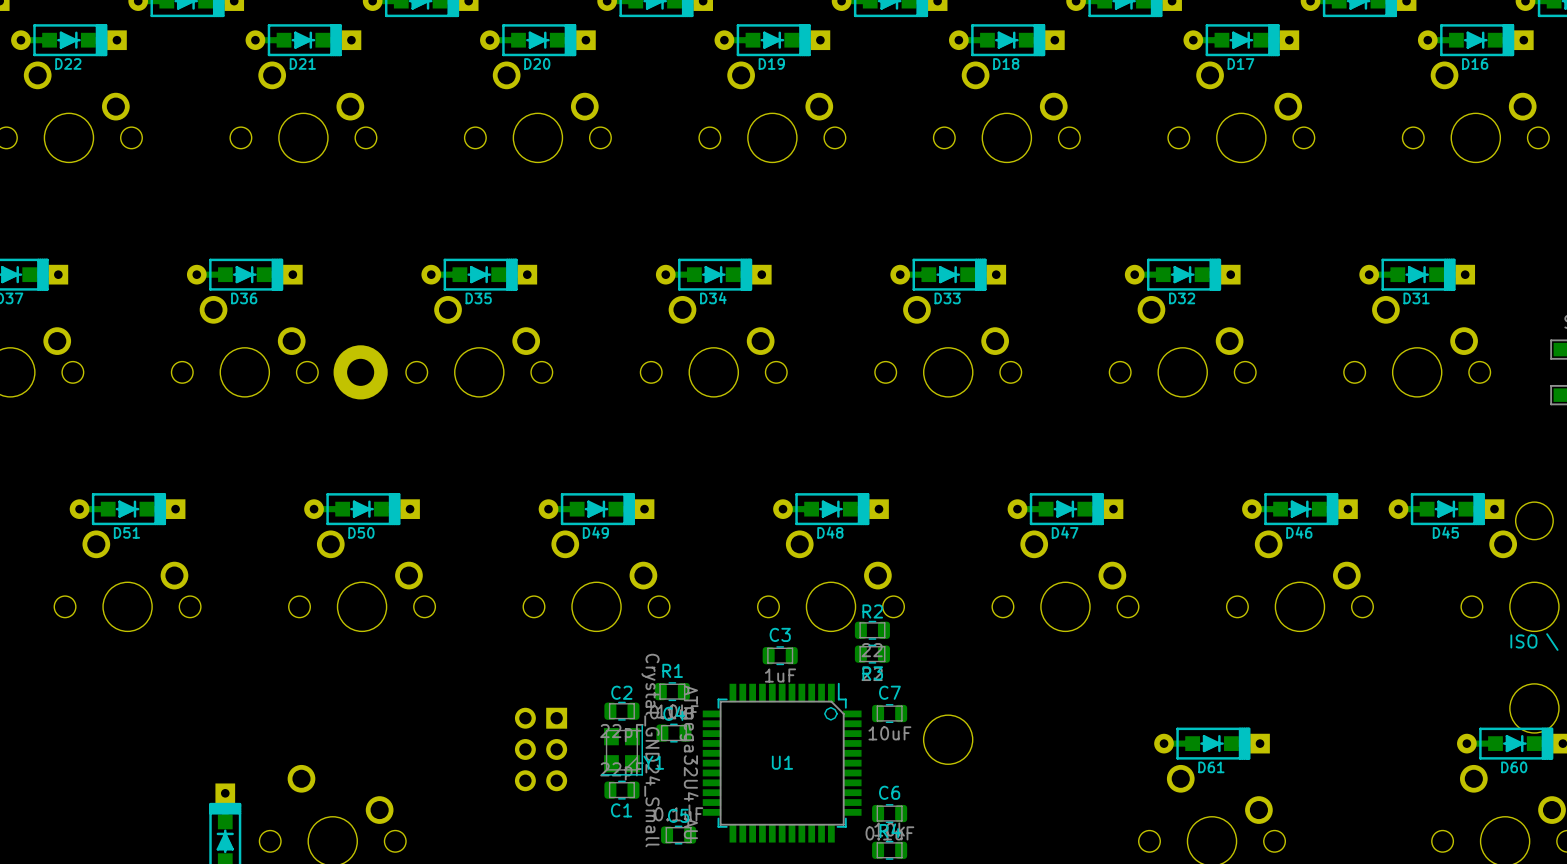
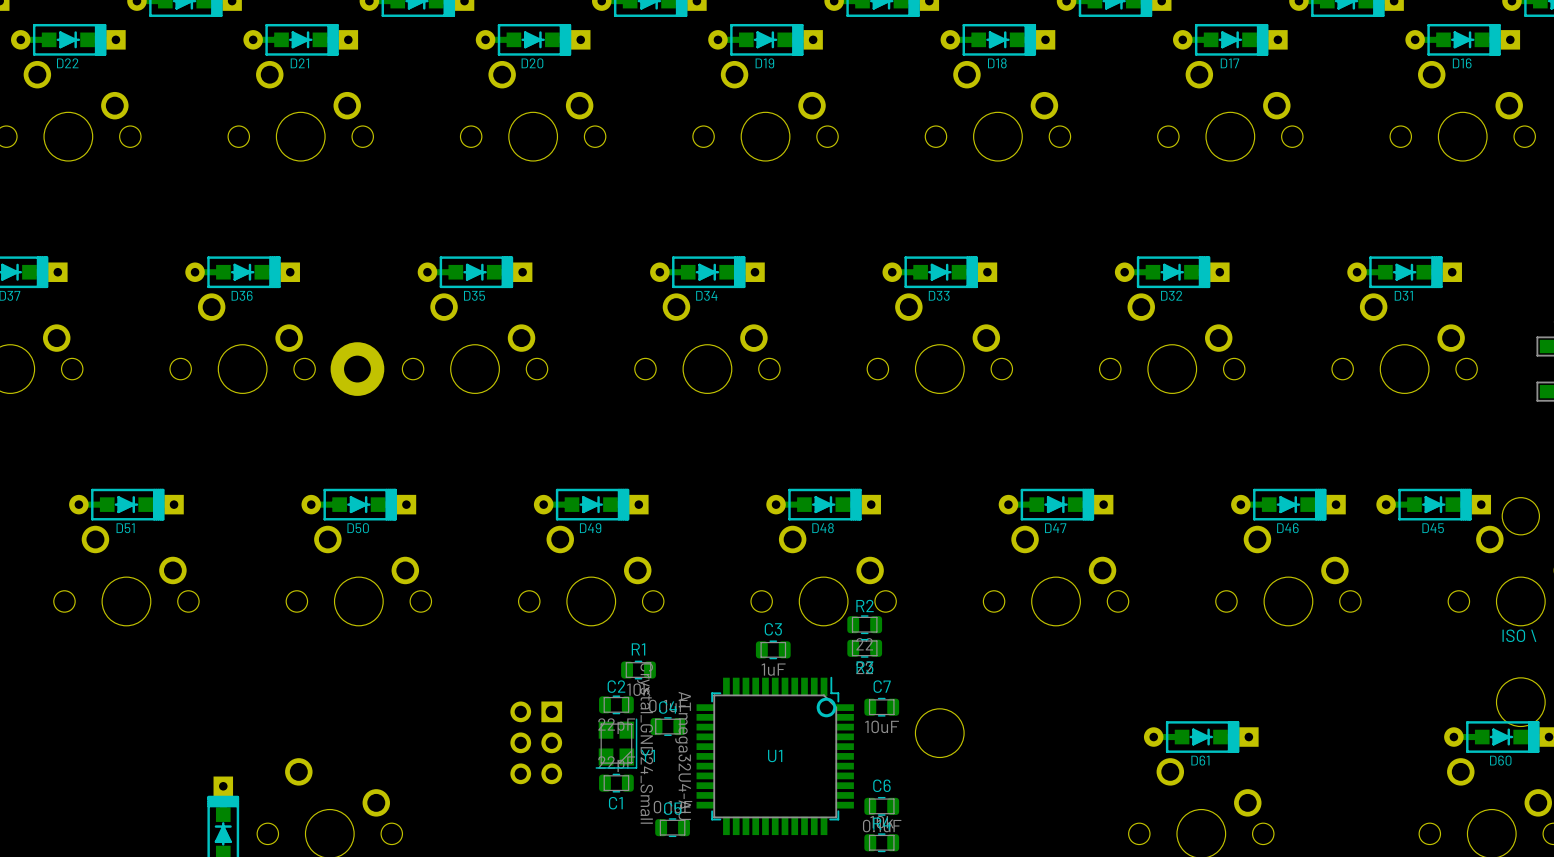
R1 position: (672, 691) -> (638, 670)

